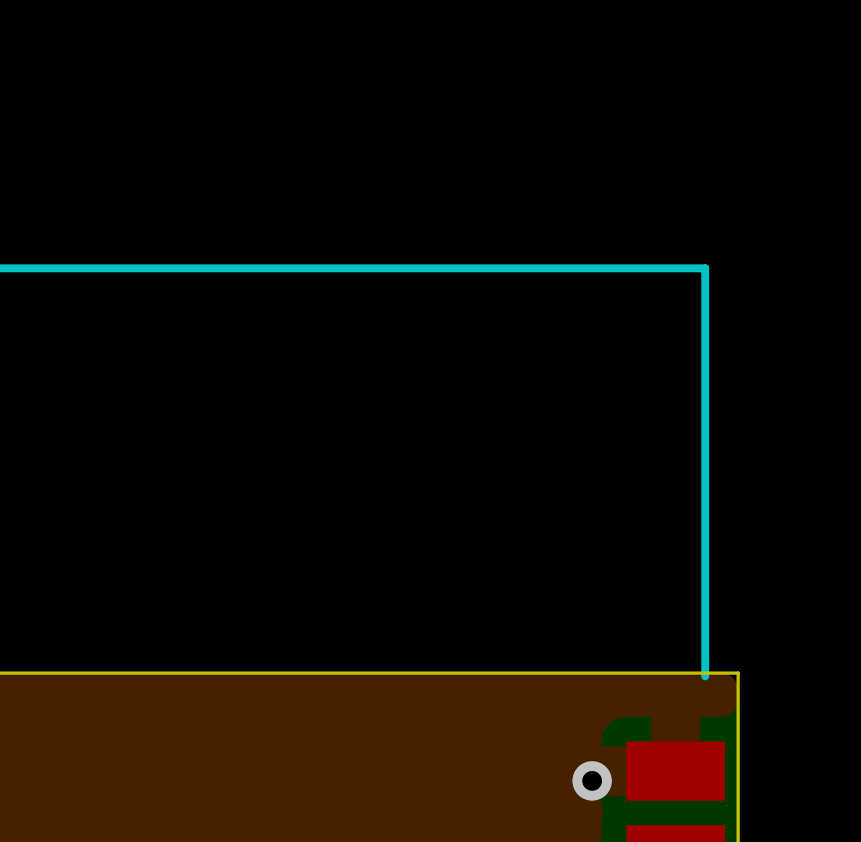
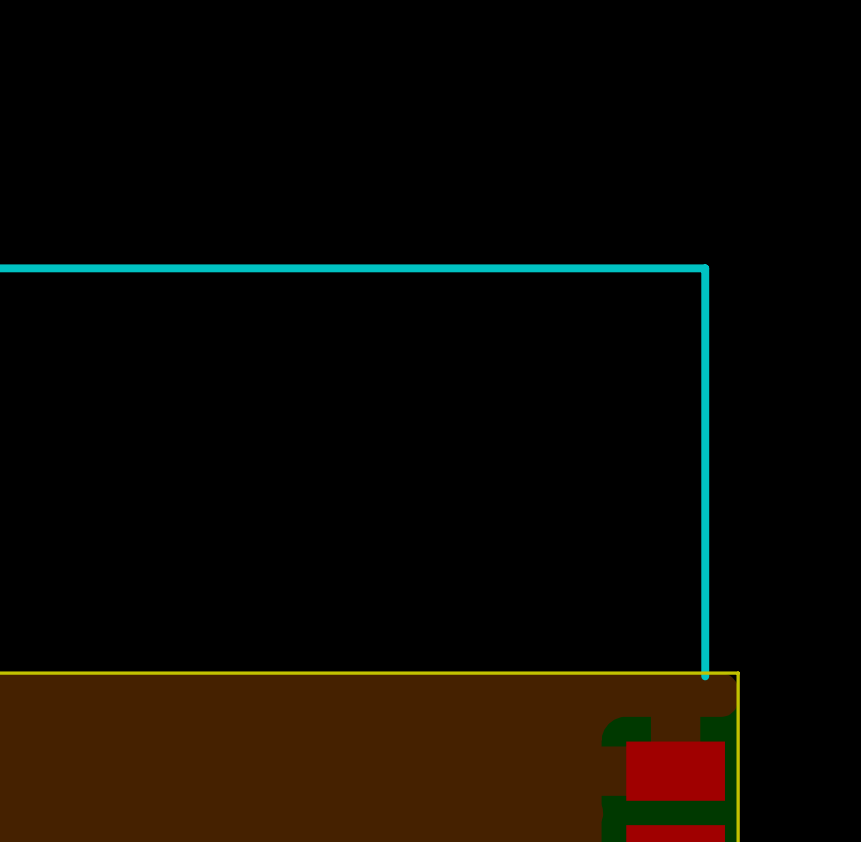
via: (592, 780) -> none

